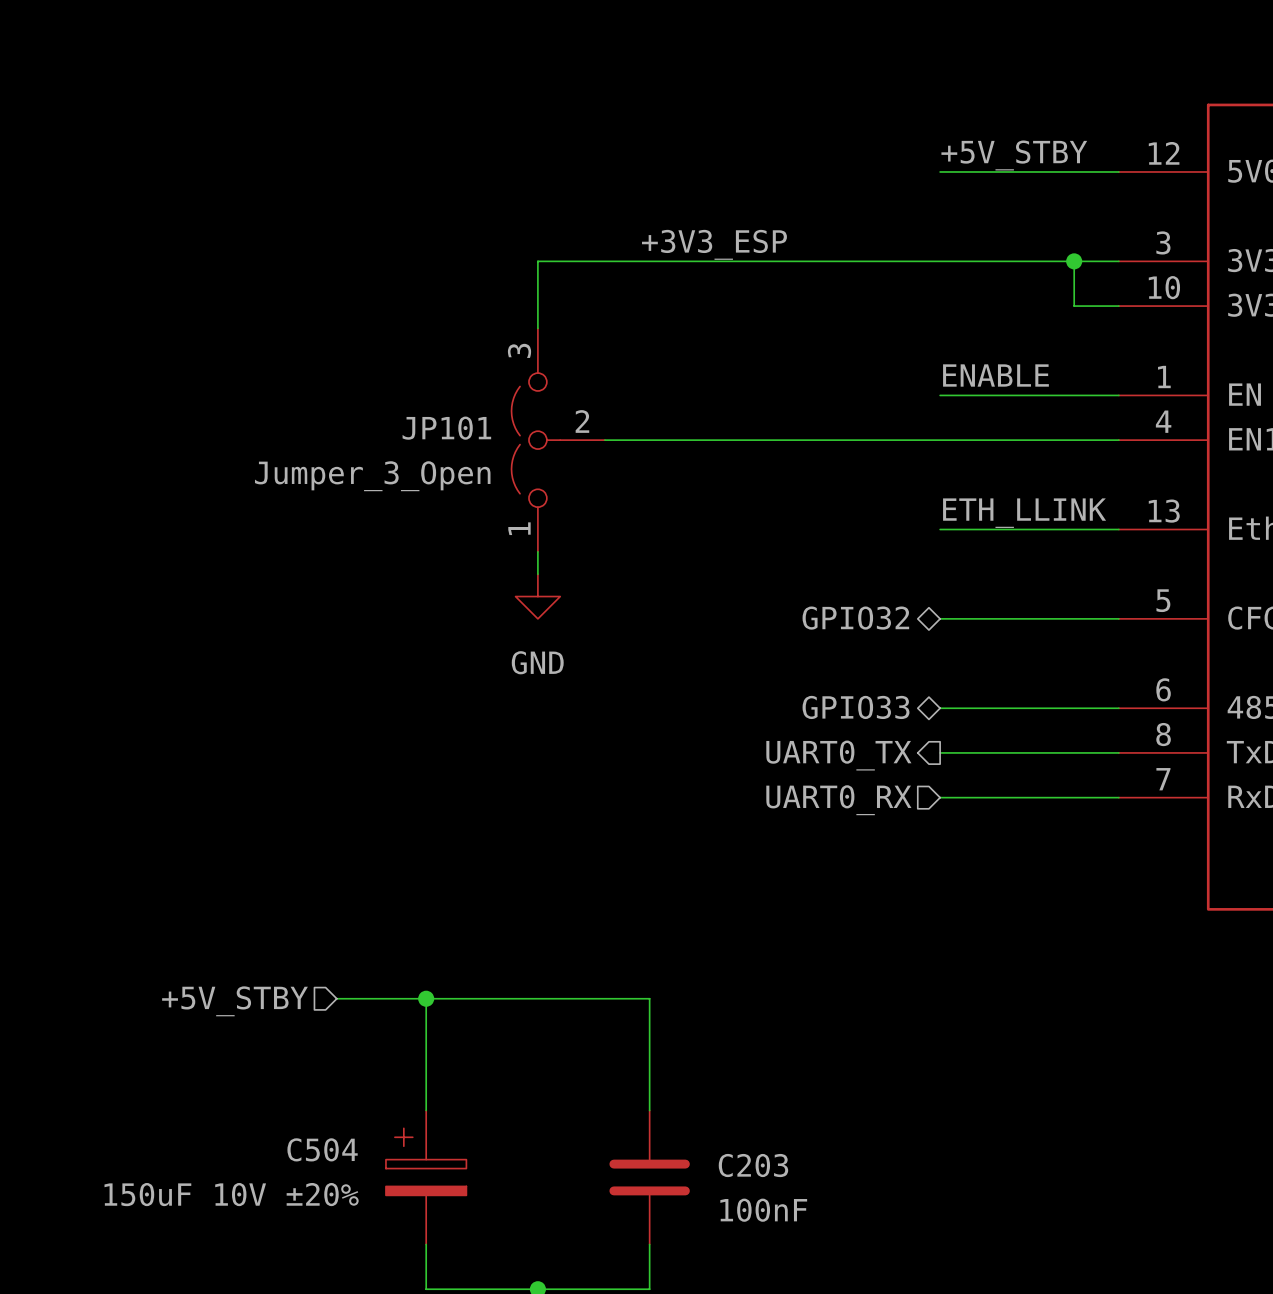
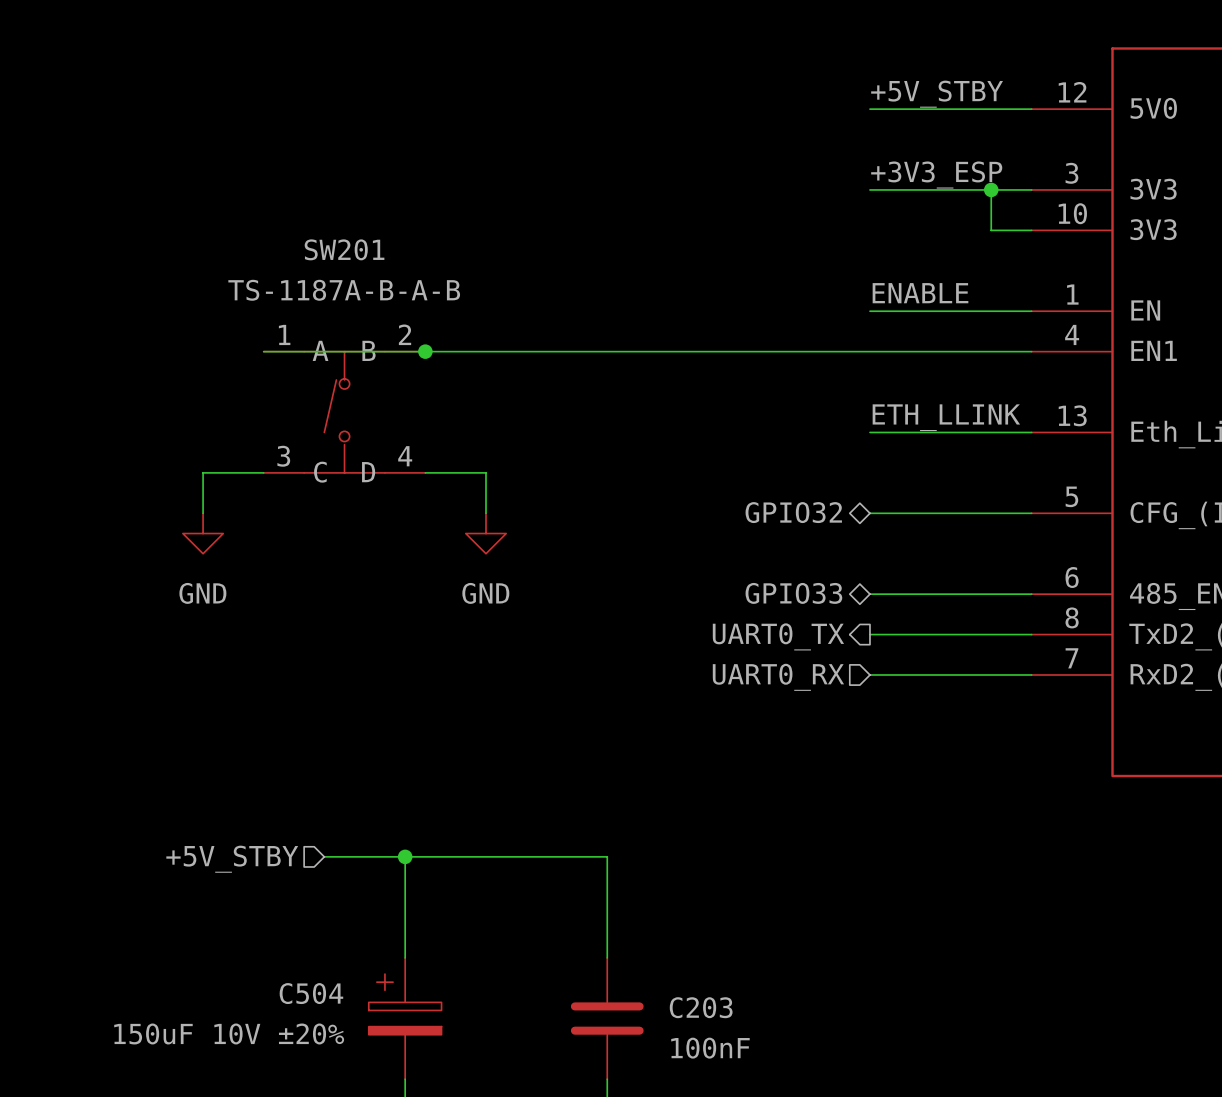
label position: +3V3_ESP (714, 244) -> +3V3_ESP (936, 175)
wire: (940, 261) (537, 261) (537, 328) -> none
wire: none -> (263, 351) (566, 351)
junction: none -> (425, 351)
JP101: Jumper_3_Open (558, 440) -> none
SW201: none -> TS-1187A-B-A-B (344, 412)
wire: (537, 551) (537, 574) -> none
wire: none -> (263, 472) (203, 472) (203, 513)
wire: none -> (425, 472) (486, 472) (486, 513)
power symbol position: GND (537, 596) -> GND (486, 533)
power symbol: none -> GND (203, 533)

